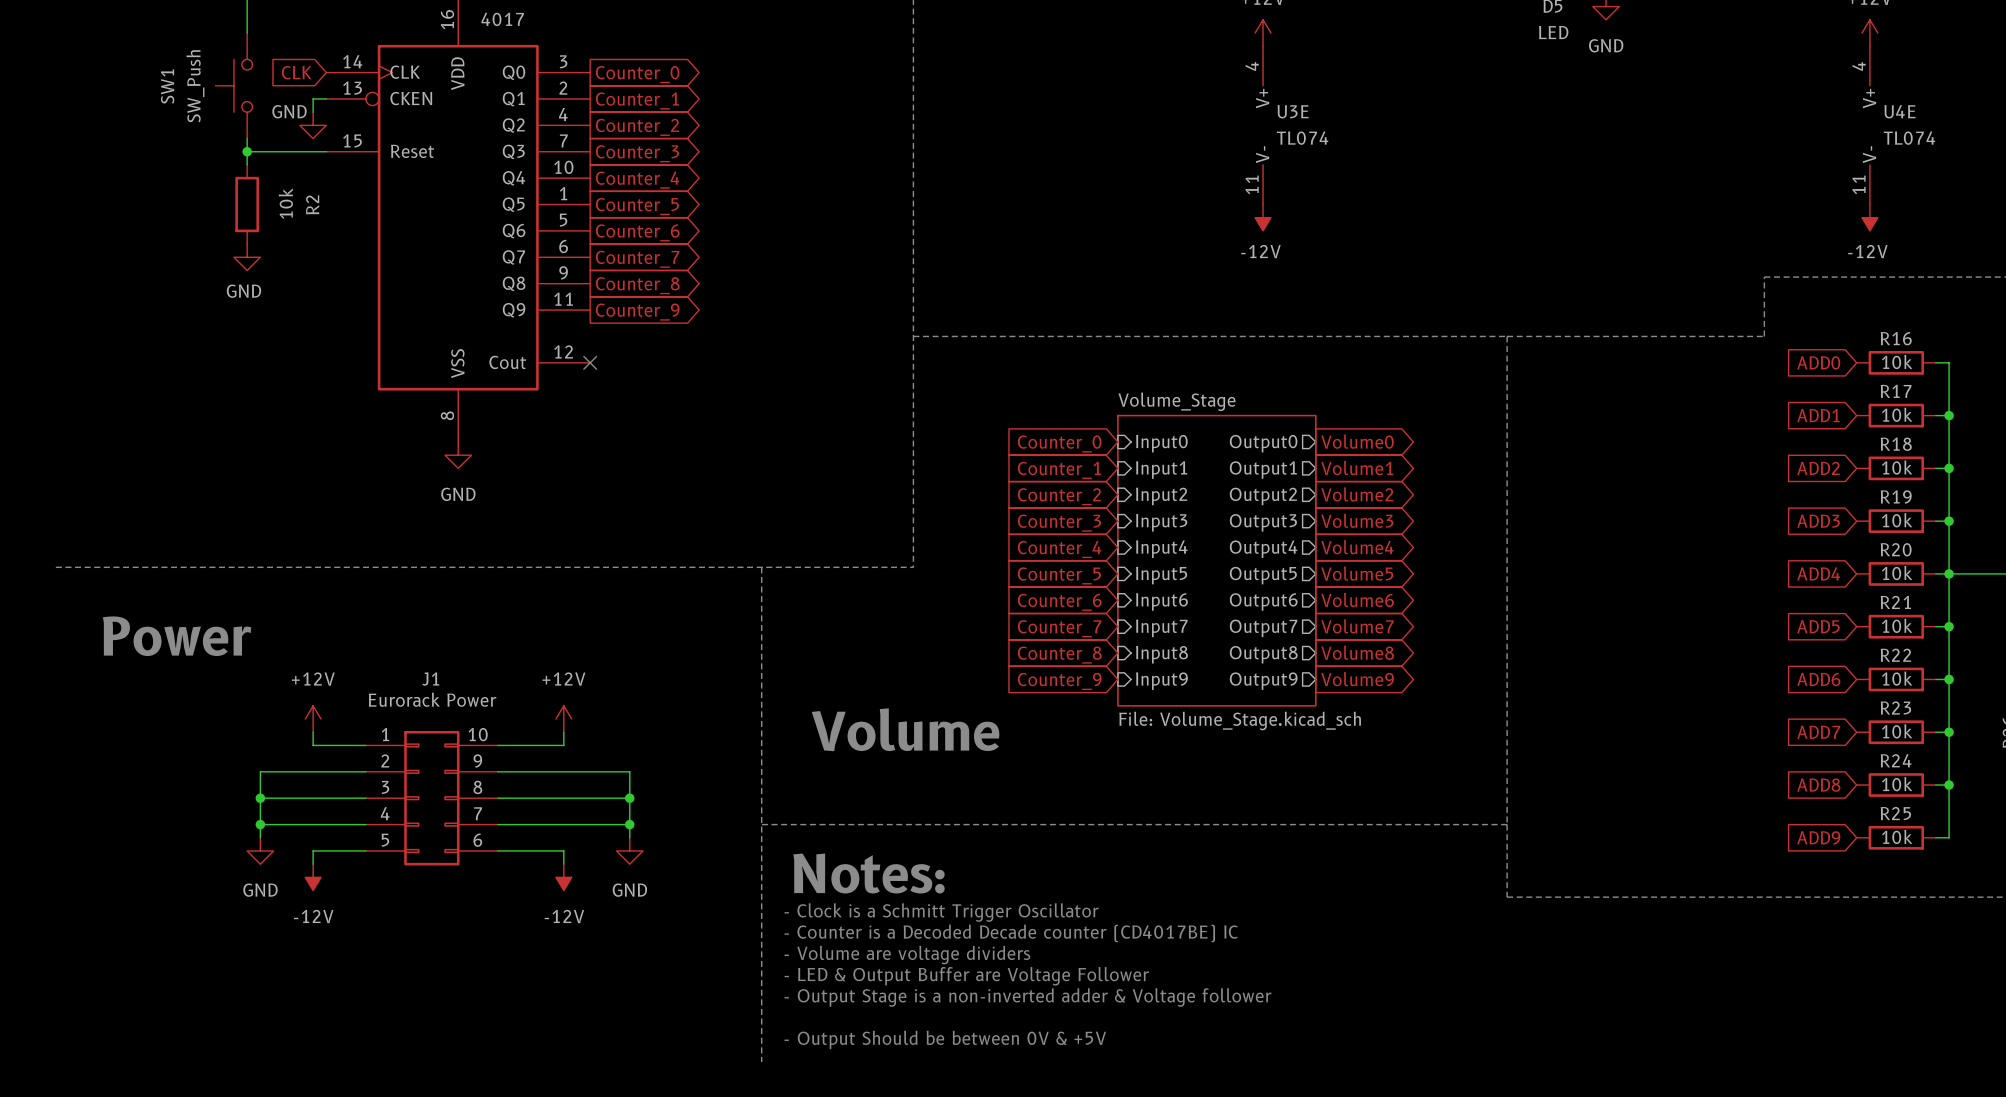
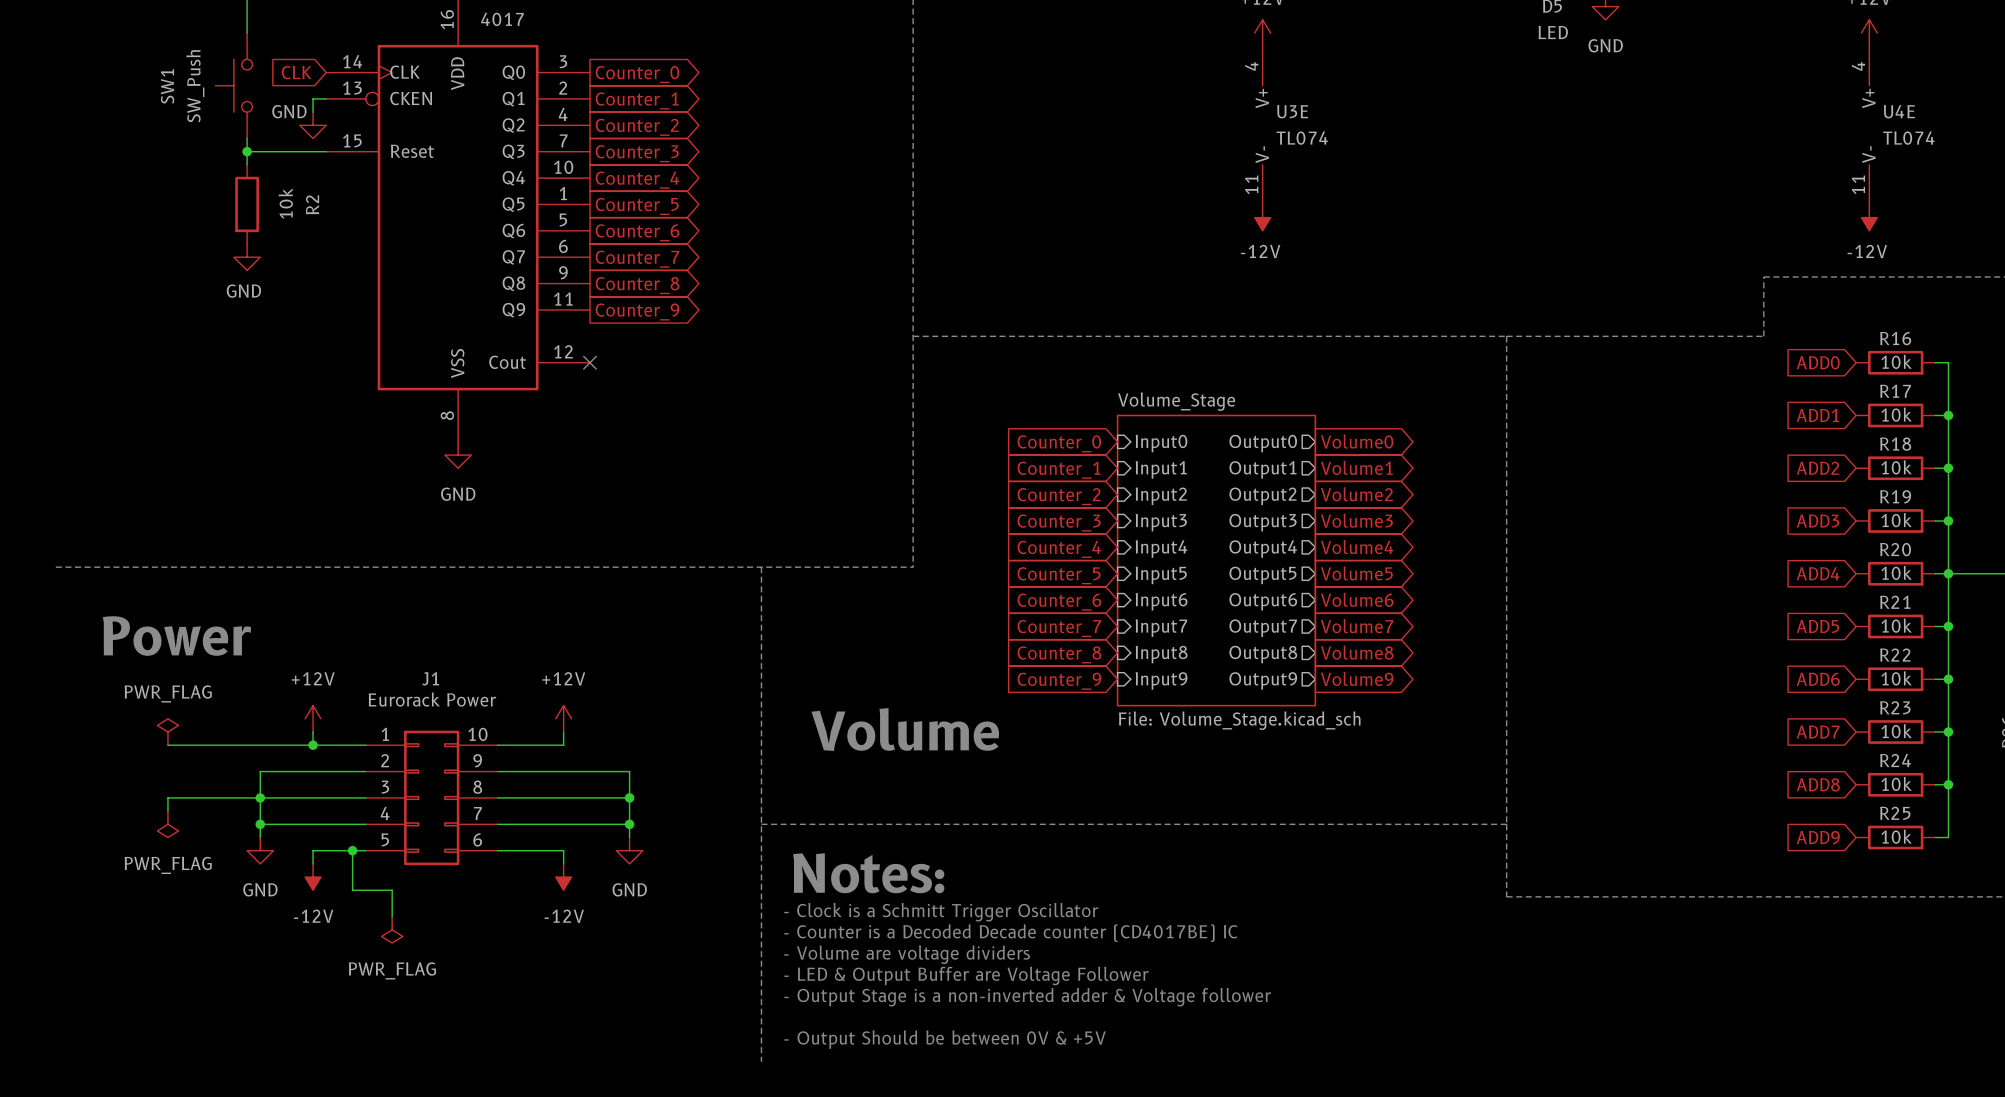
power symbol: none -> PWR_FLAG (167, 732)
wire: none -> (167, 745) (313, 745)
junction: none -> (313, 745)
wire: none -> (260, 797) (167, 797) (167, 811)
power symbol: none -> PWR_FLAG (167, 824)
wire: none -> (352, 850) (352, 890) (392, 890) (392, 916)
junction: none -> (352, 850)
power symbol: none -> PWR_FLAG (392, 929)

